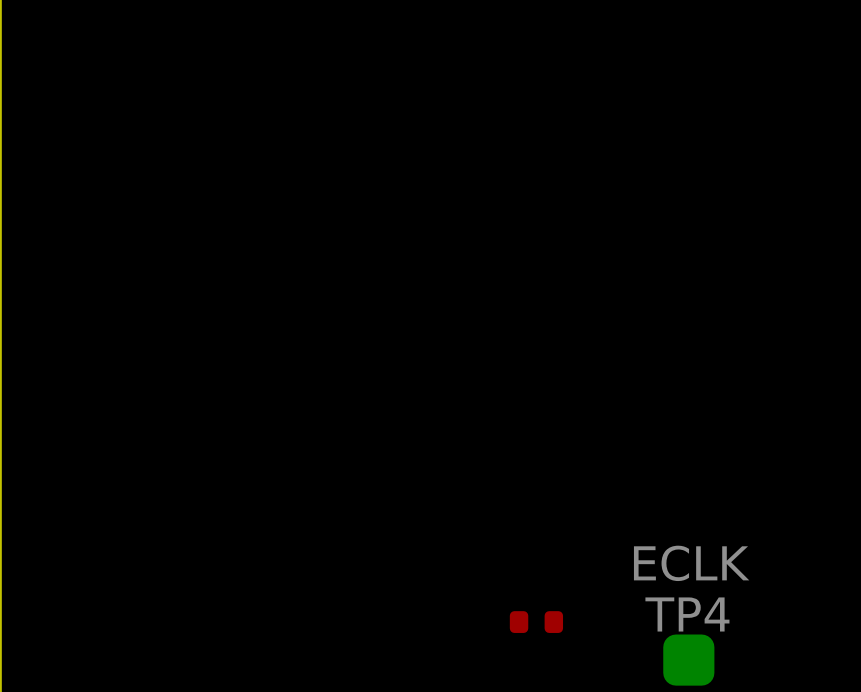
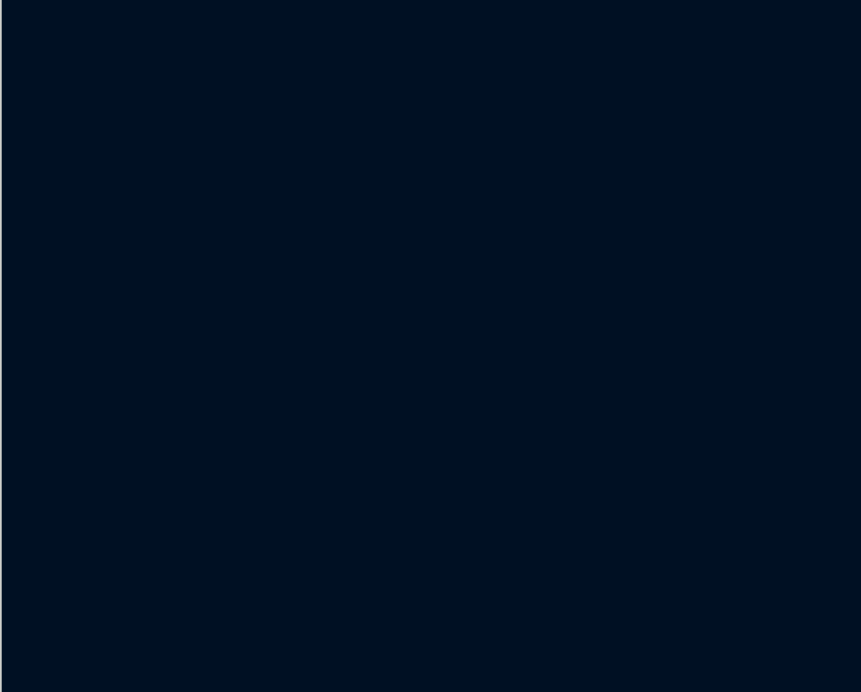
part: (536, 622) -> none
TP4: ECLK (688, 660) -> none

